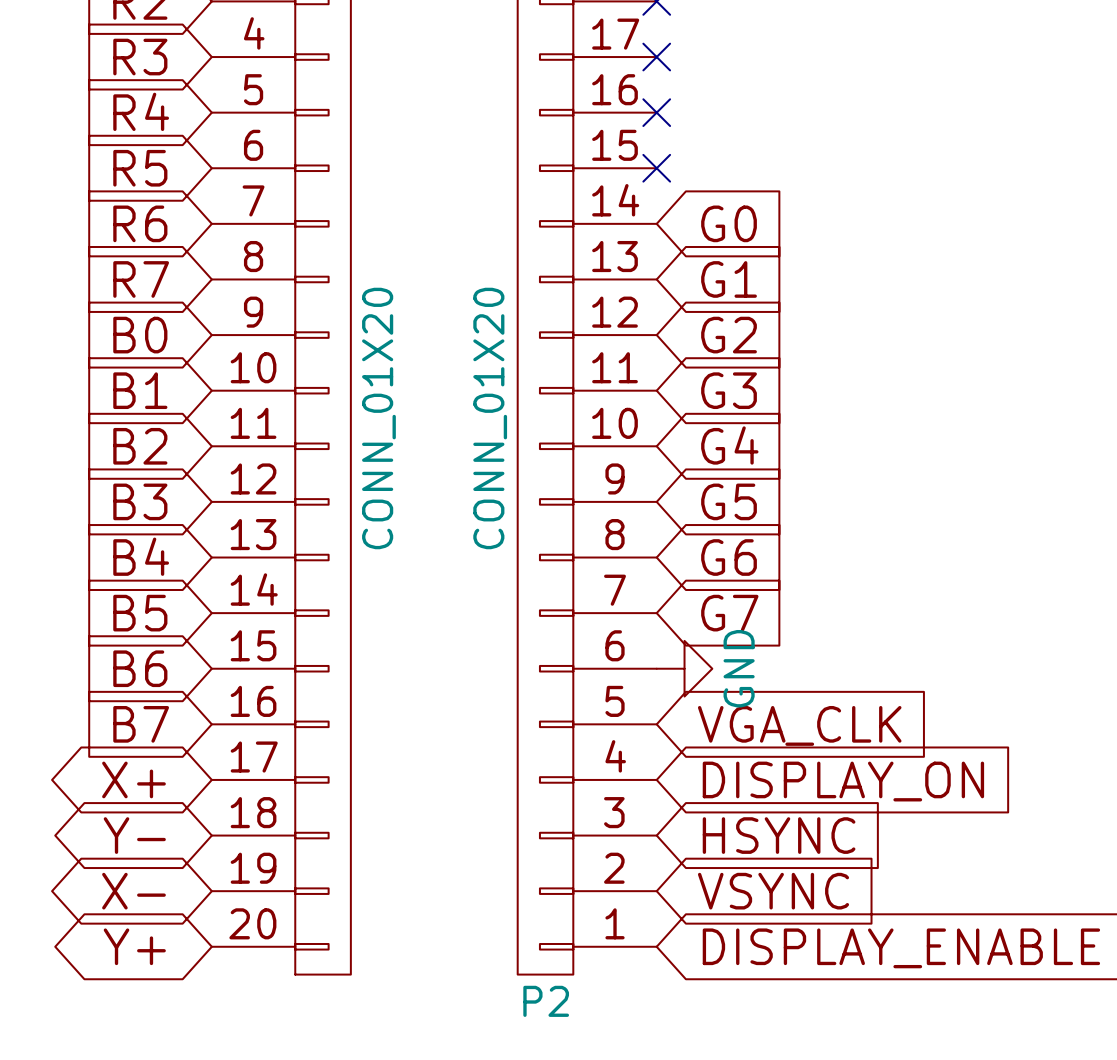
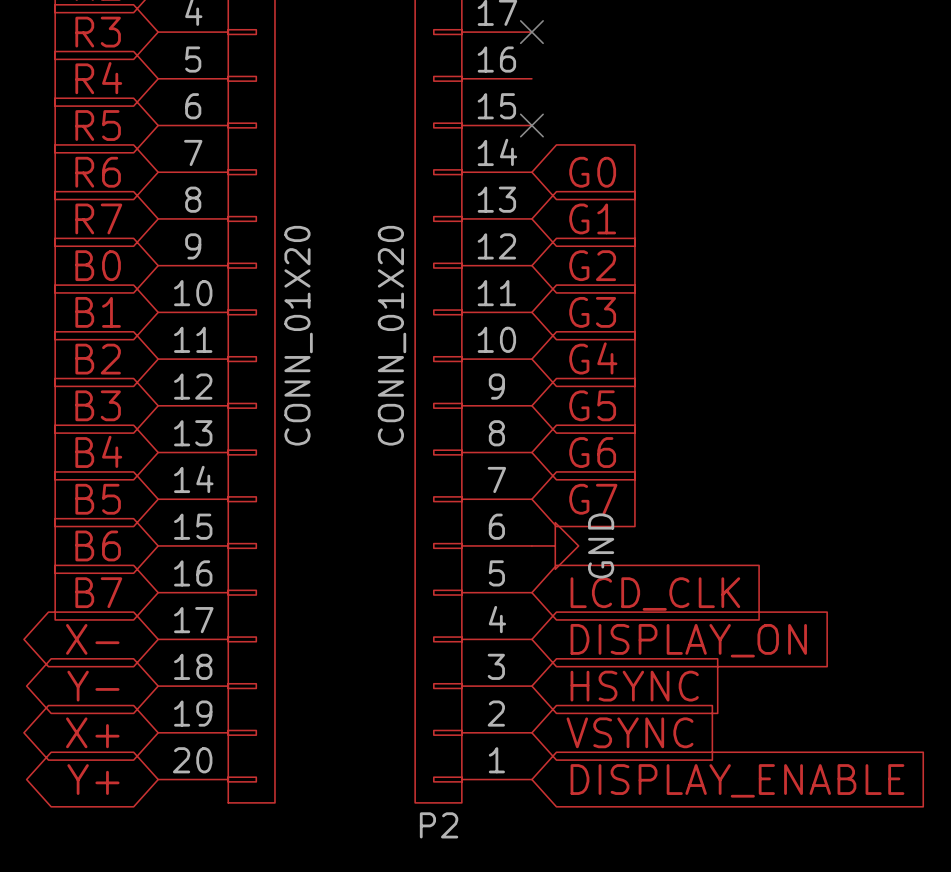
no-connect mark: (656, 112) -> none
global label: VGA_CLK (799, 725) -> LCD_CLK (655, 594)
global label: X+ (133, 779) -> X- (92, 639)
global label: X- (133, 891) -> X+ (92, 732)

